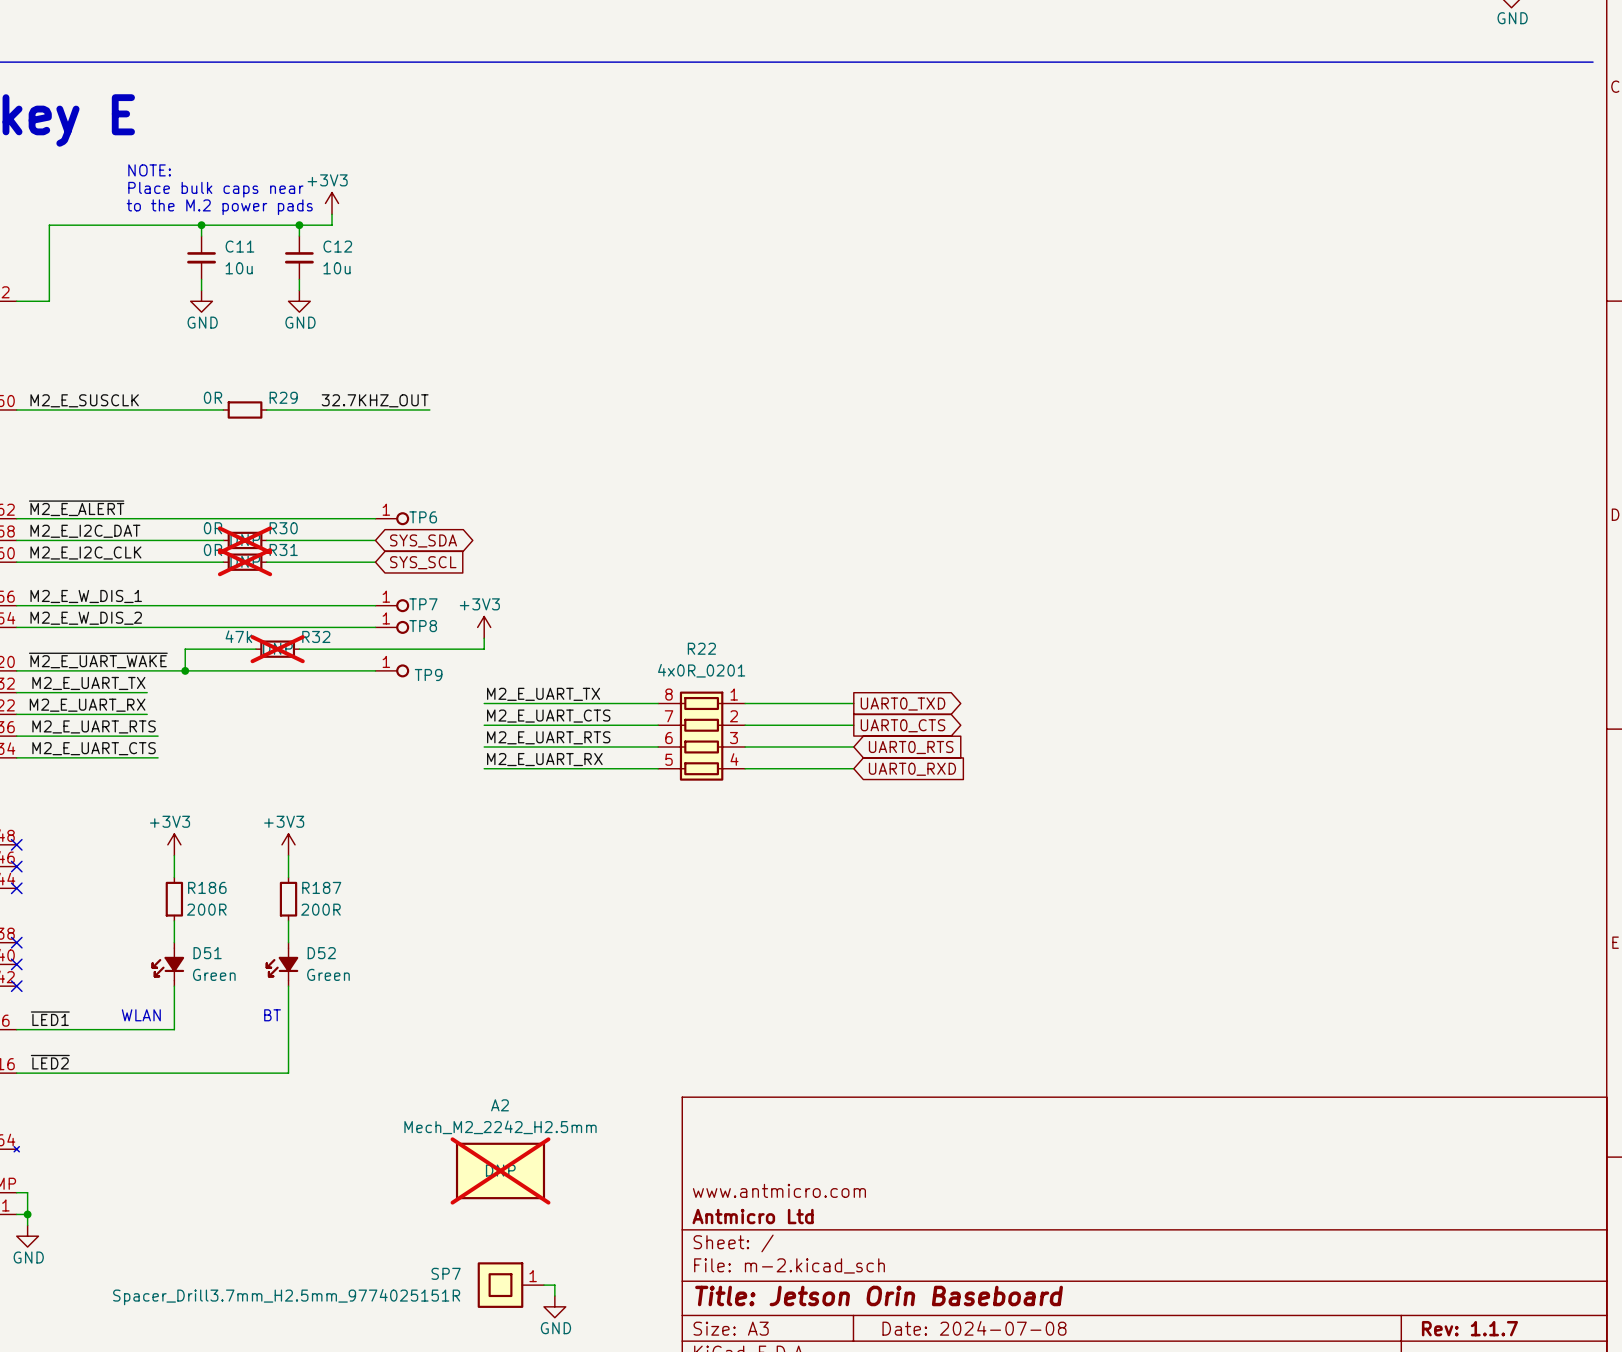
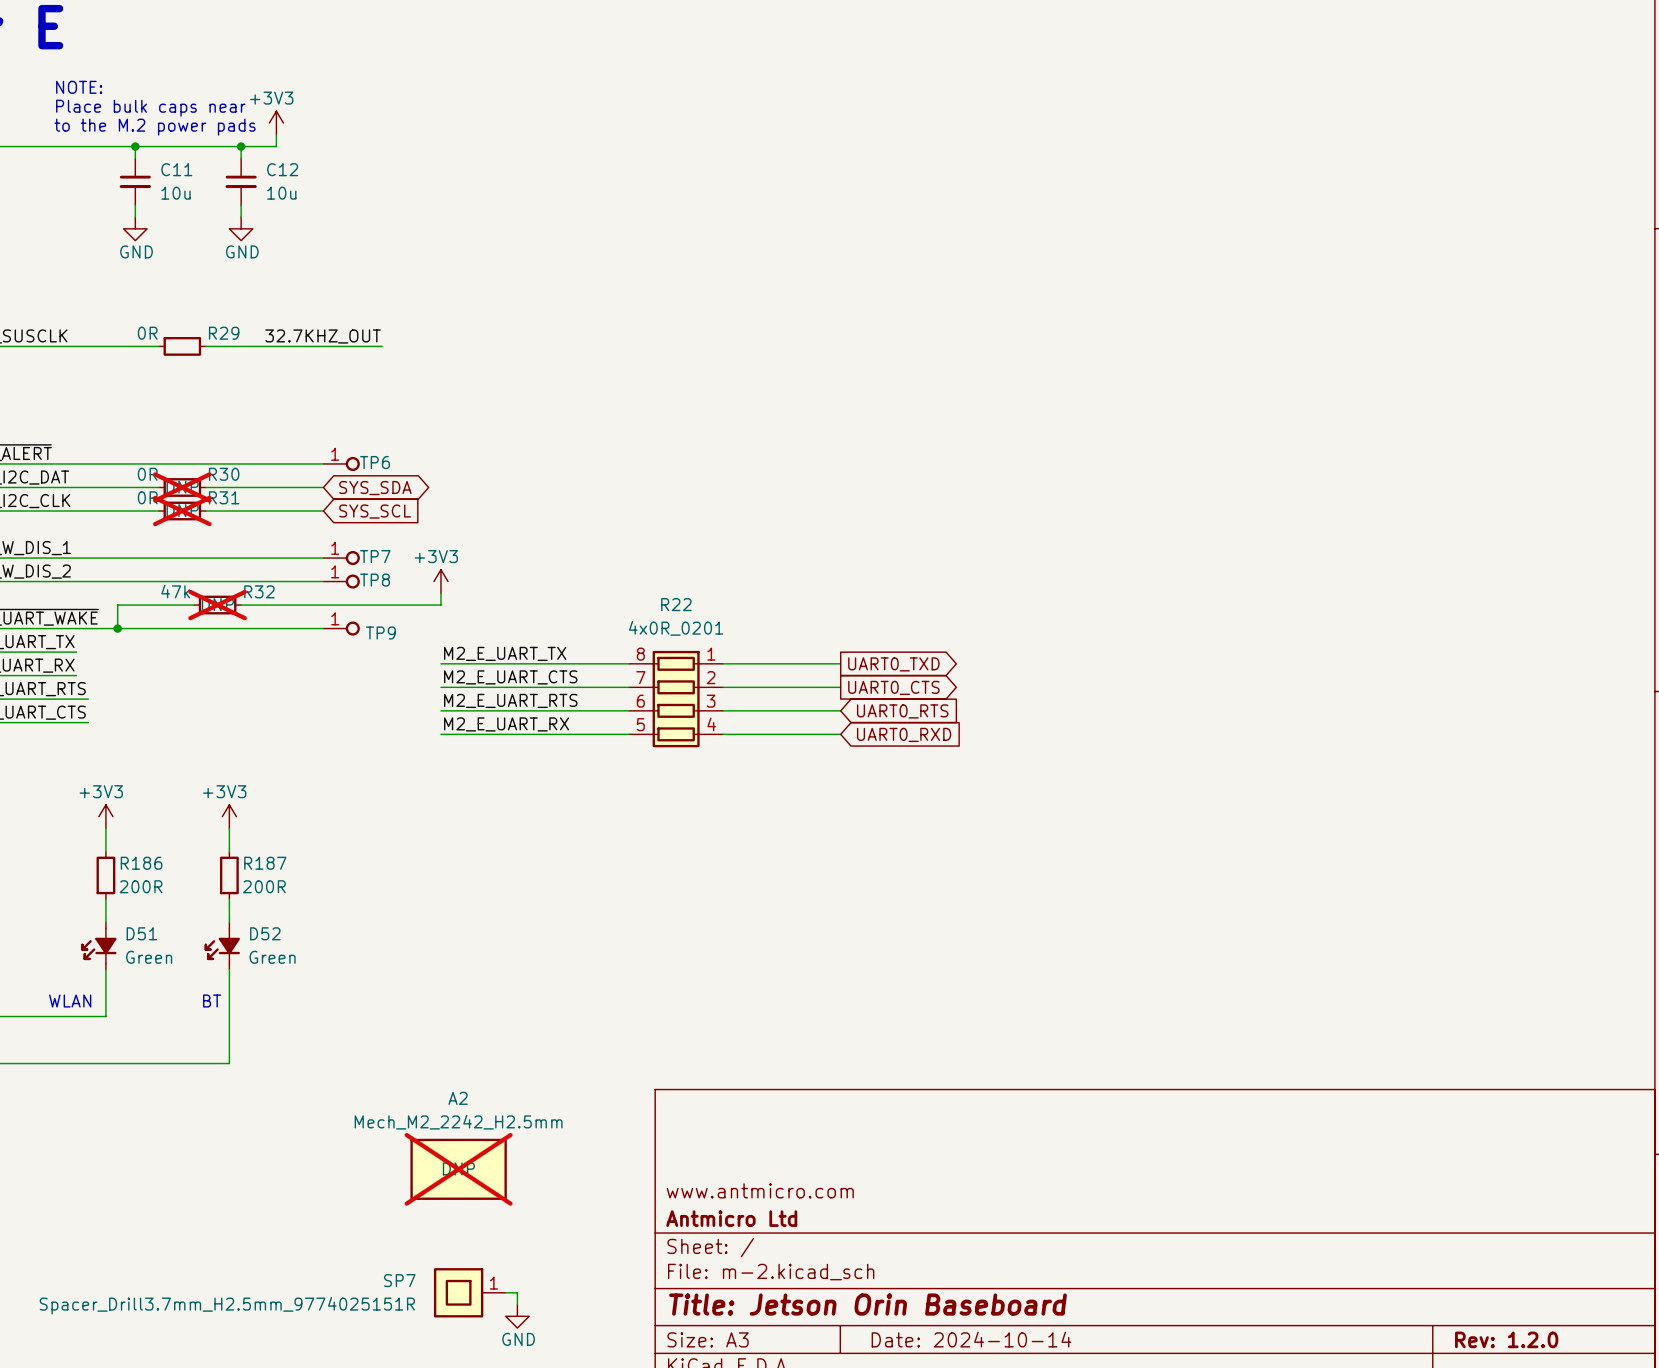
title block: Date: 2024-07-08 (974, 1328) -> Date: 2024-10-14 (971, 1339)
title block: Rev: 1.1.7 (1469, 1328) -> Rev: 1.2.0 (1506, 1339)

